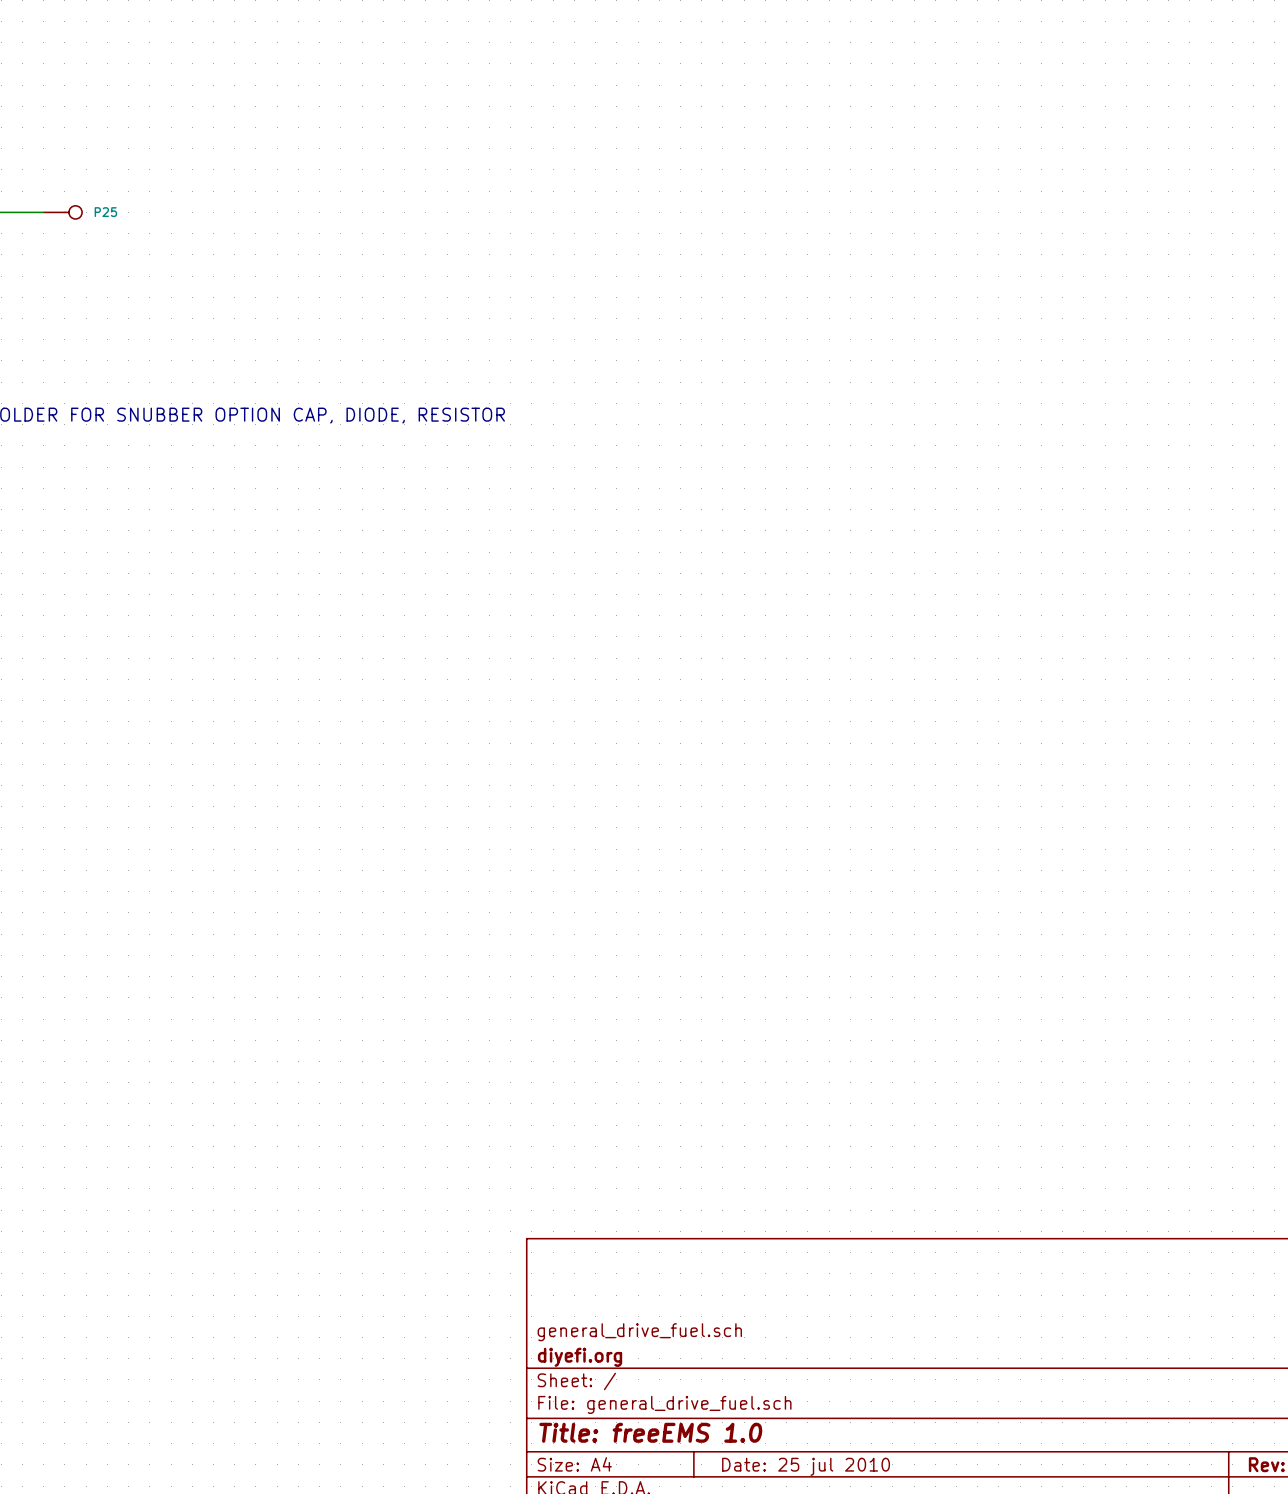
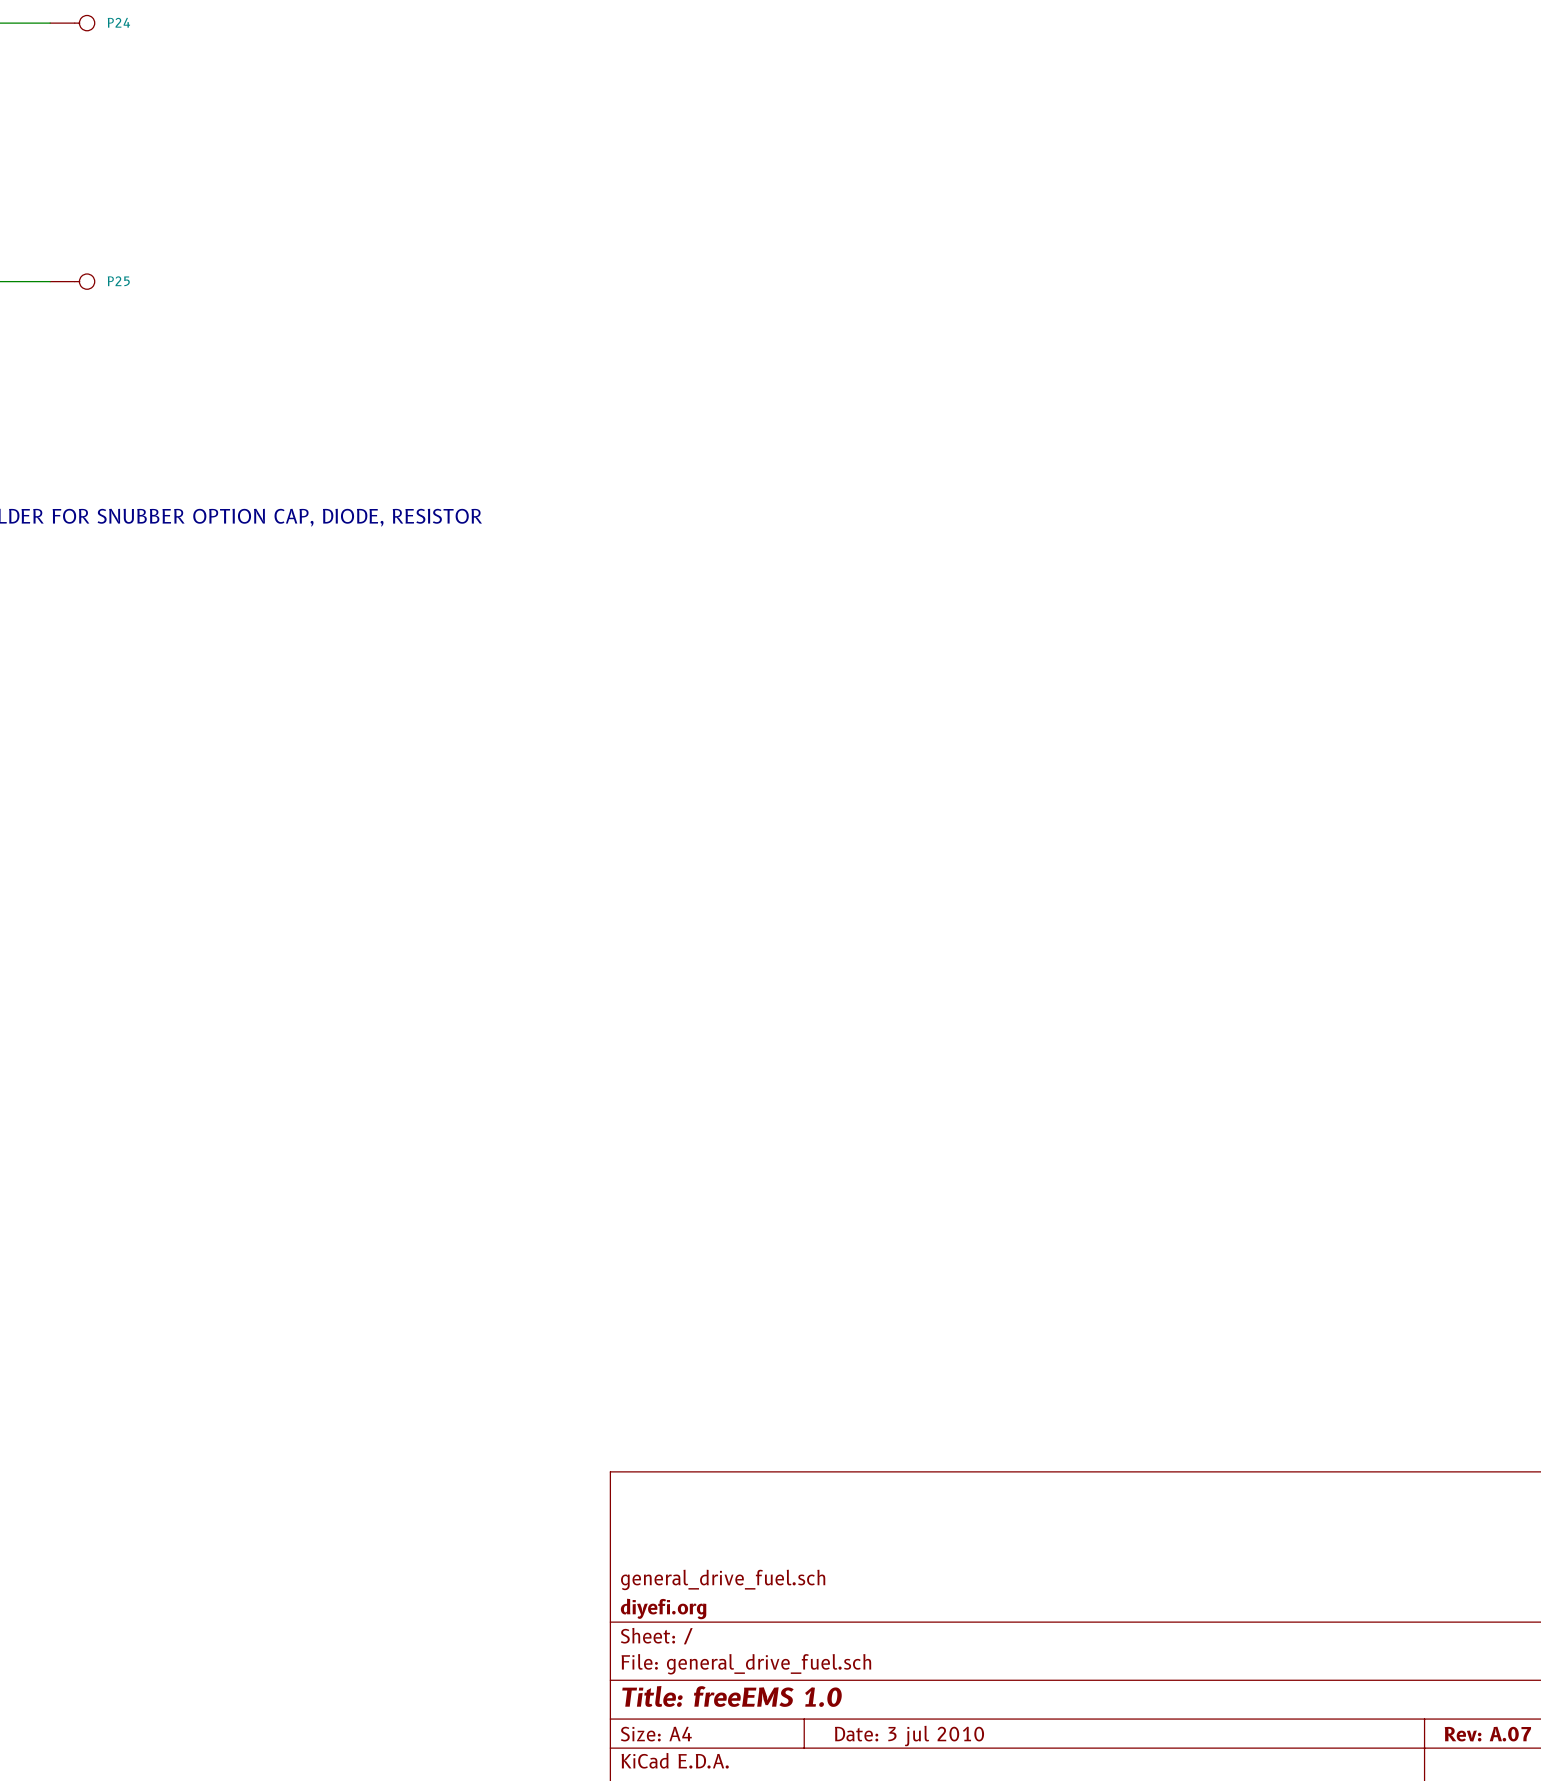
title block: Date: 25 jul 2010 (806, 1466) -> Date: 3 jul 2010 (909, 1736)

